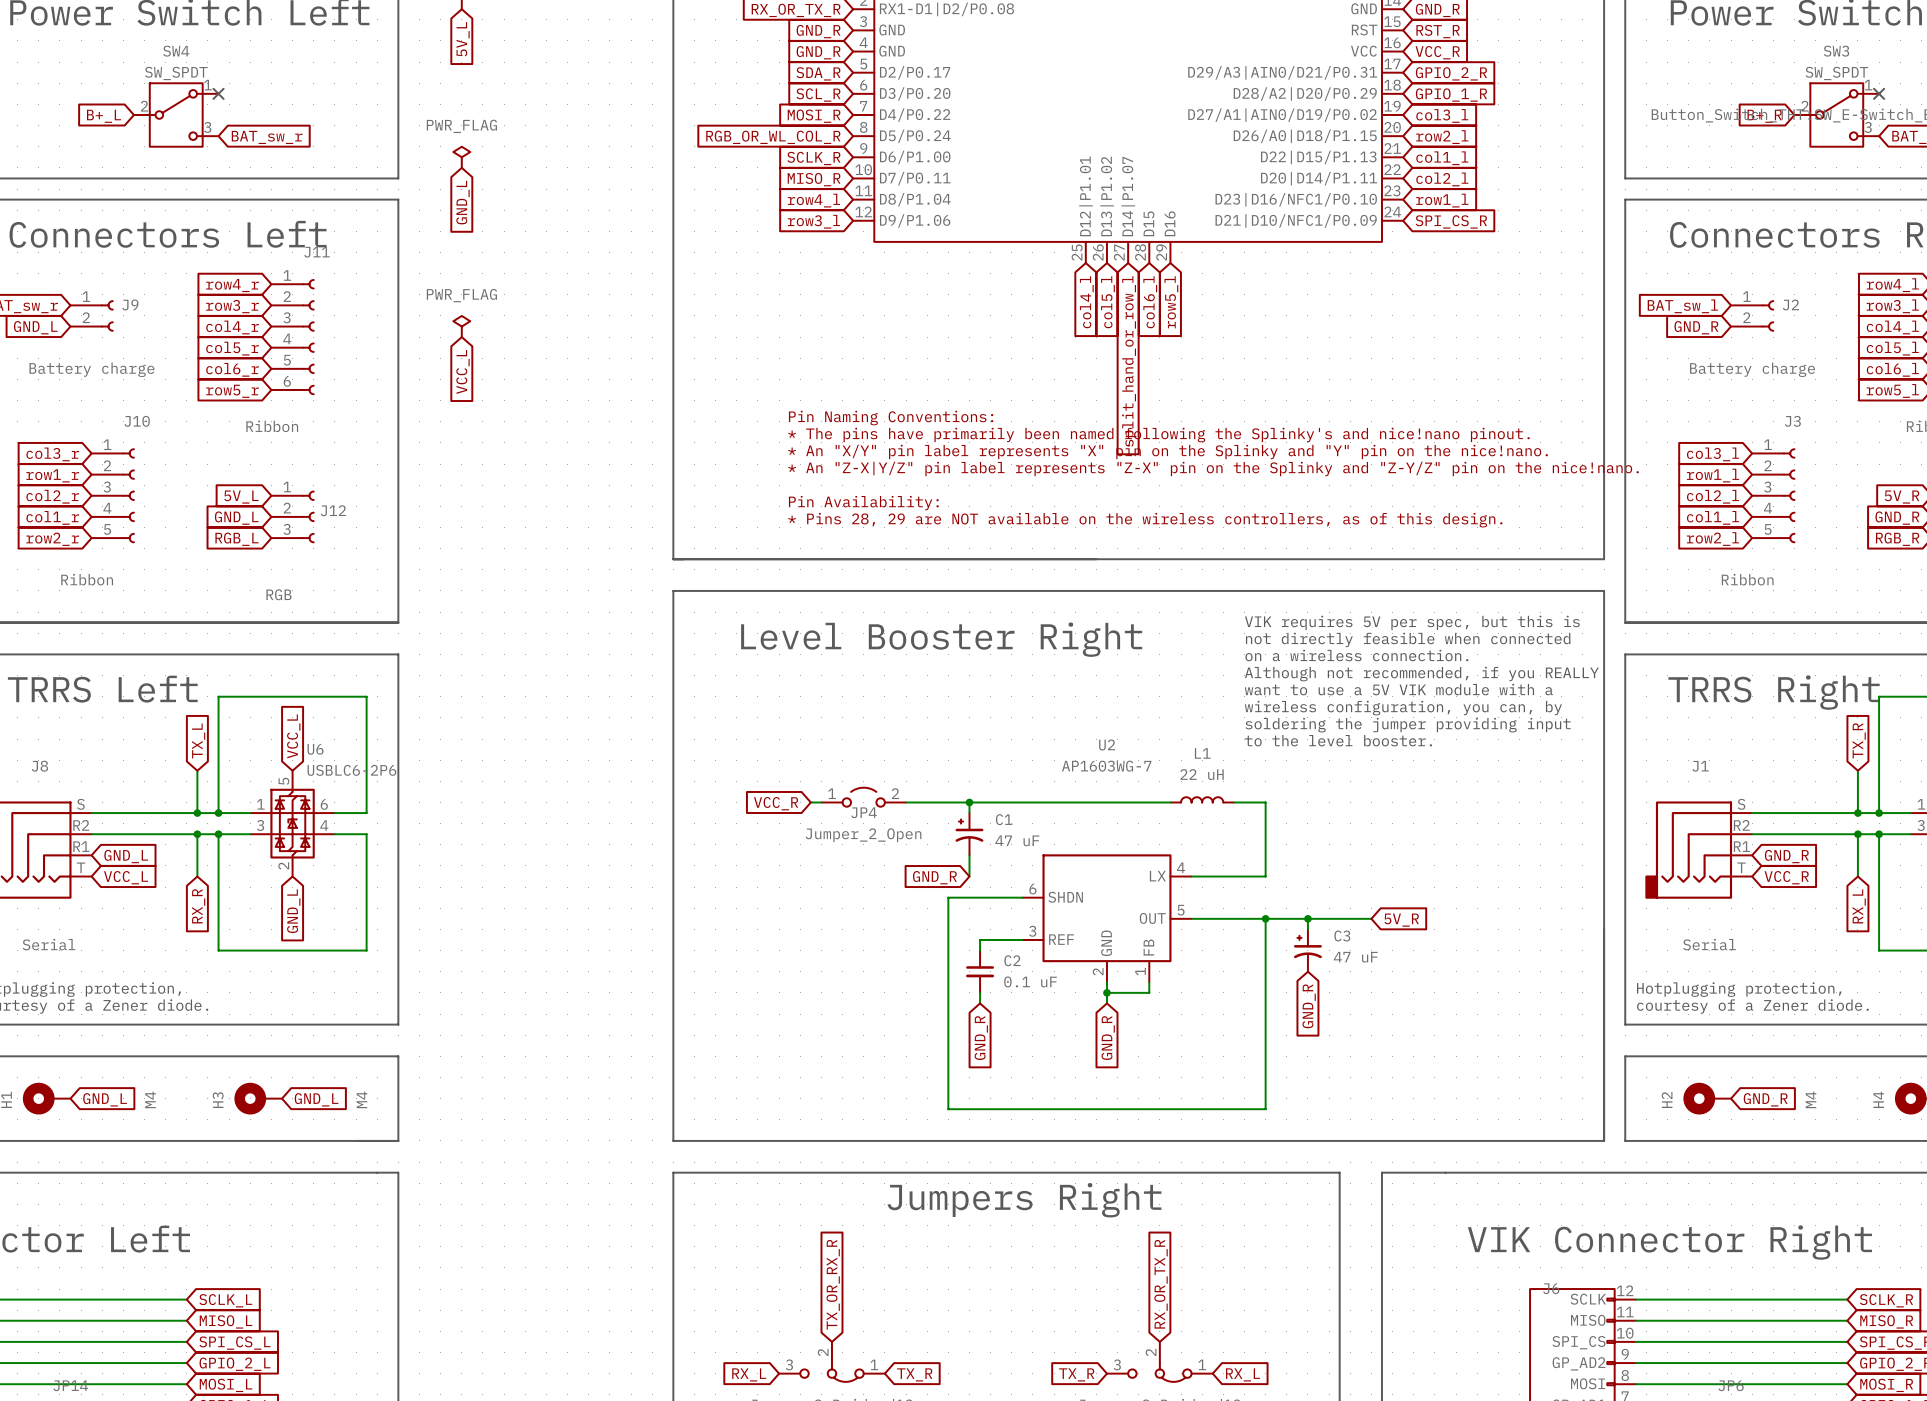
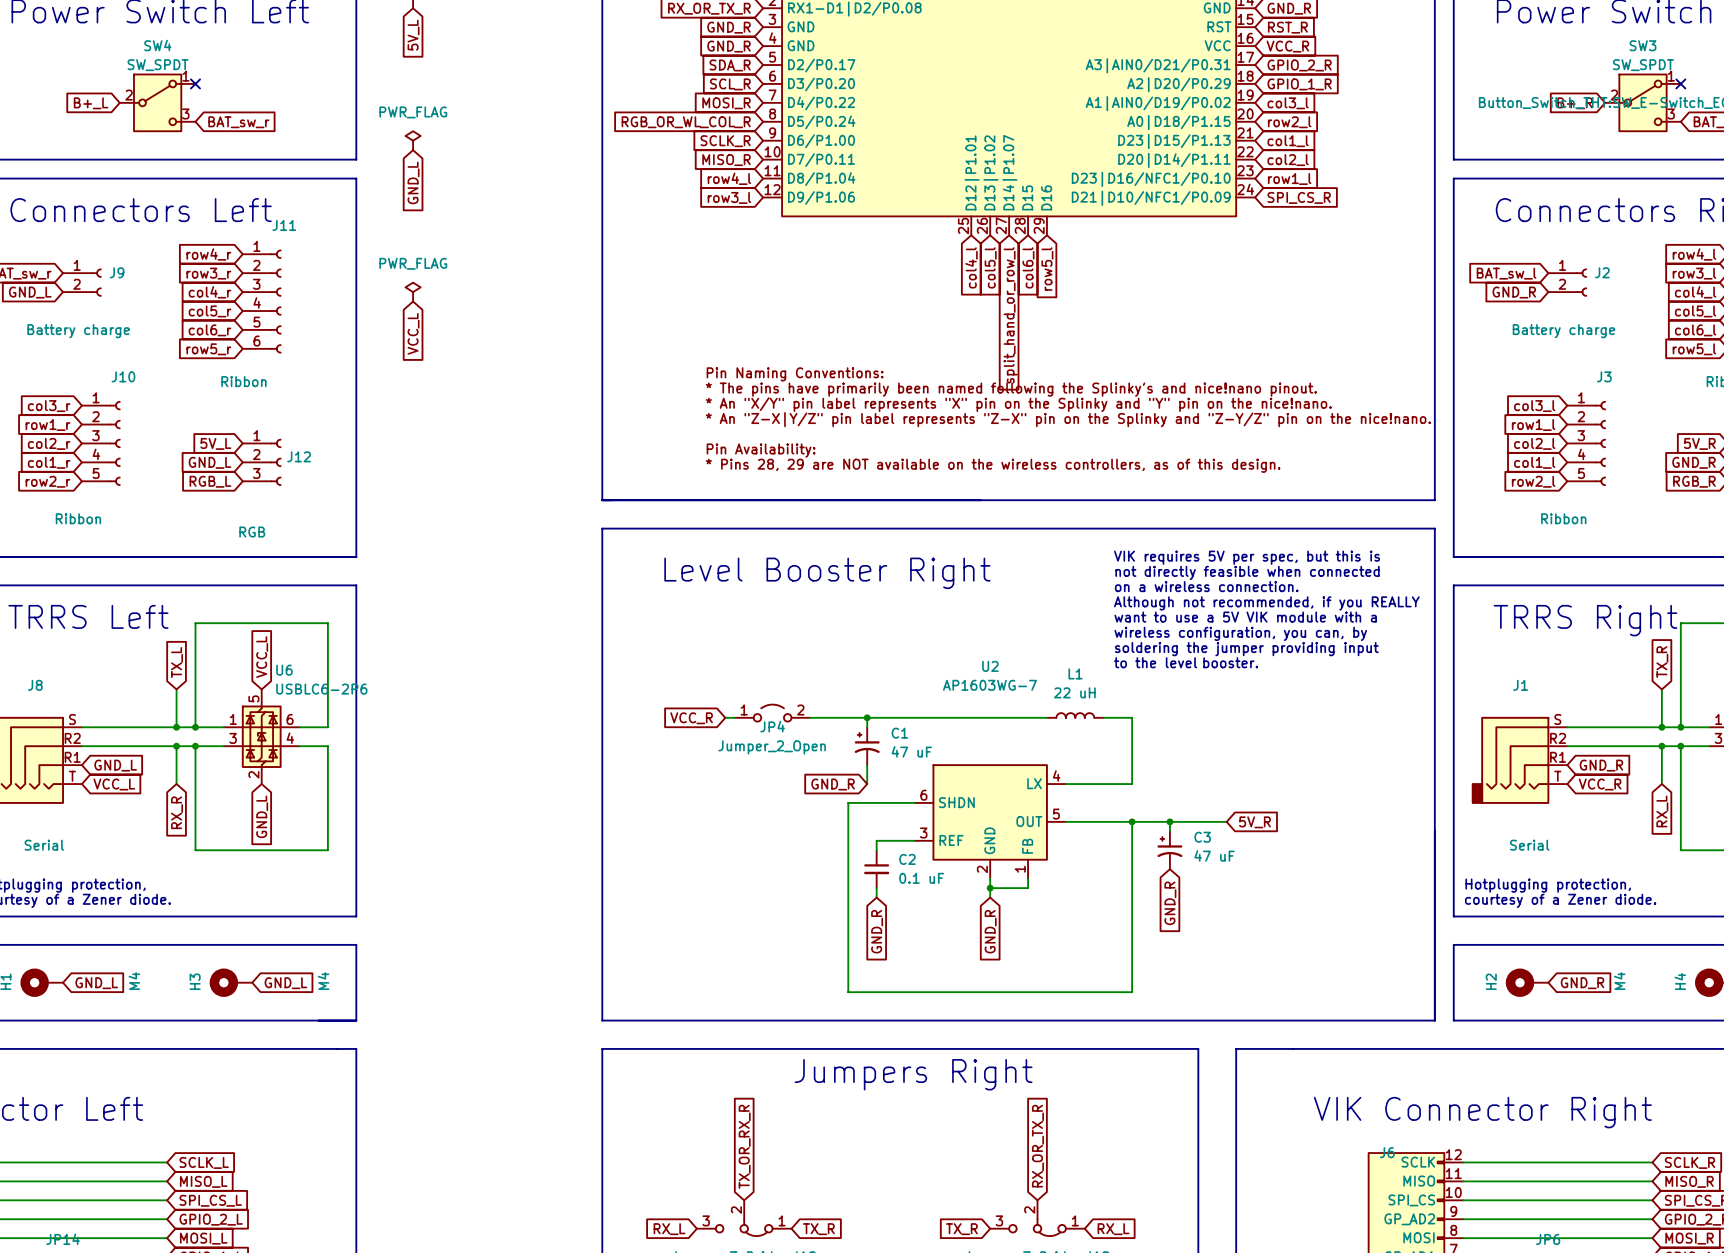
part pin name: D29/A3|AIN0/D21/P0.31 (1282, 72) -> A3|AIN0/D21/P0.31 (1158, 65)
part pin name: D28/A2|D20/P0.29 (1305, 94) -> A2|D20/P0.29 (1178, 84)
part pin name: D27/A1|AIN0/D19/P0.02 (1282, 115) -> A1|AIN0/D19/P0.02 (1158, 103)
part pin name: D26/A0|D18/P1.15 (1305, 136) -> A0|D18/P1.15 (1178, 122)
part pin name: D22|D15/P1.13 (1318, 157) -> D23|D15/P1.13 (1174, 141)

